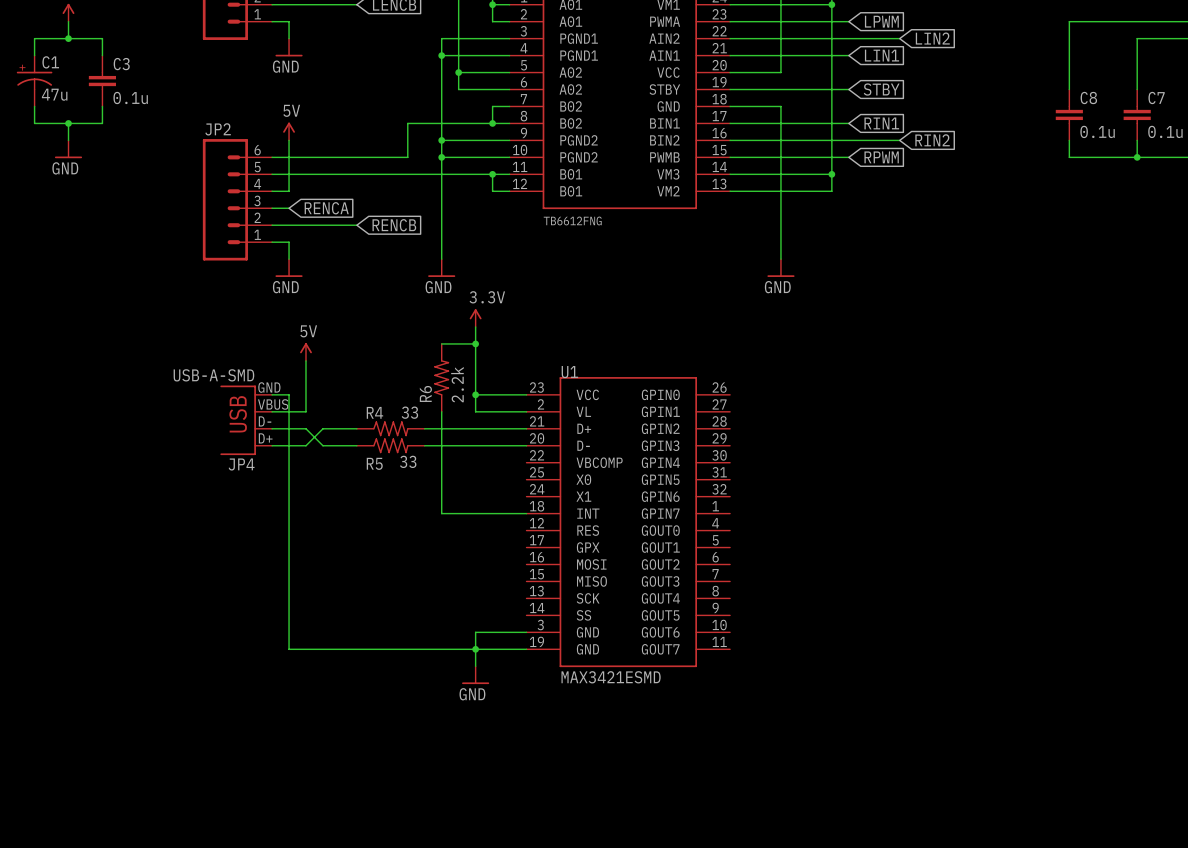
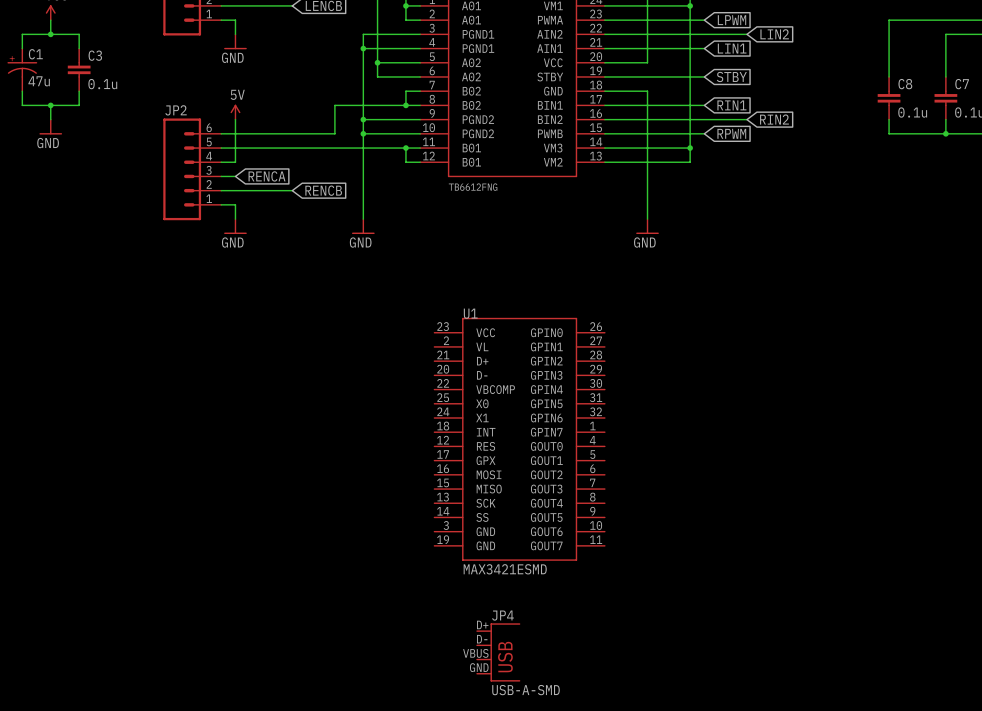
power symbol: 3.3V (475, 318) -> none
wire: (475, 327) (475, 411) (526, 411) -> none
wire: (441, 343) (475, 343) -> none
junction: (475, 343) -> none
power symbol: 5V (305, 352) -> none
wire: (305, 360) (305, 411) (272, 411) -> none
JP4 value position: USB-A-SMD (213, 375) -> USB-A-SMD (526, 690)
R6: 2.2k (441, 377) -> none
JP4 symbol: [220, 385, 273, 456] -> [477, 623, 521, 682]
wire: (272, 394) (289, 394) (289, 649) (526, 649) -> none
wire: (475, 394) (526, 394) -> none
junction: (475, 394) -> none
wire: (441, 411) (441, 513) (526, 513) -> none
wire: (272, 428) (305, 428) (322, 445) (356, 445) -> none
wire: (356, 428) (322, 428) (305, 445) (272, 445) -> none
R4: 33 (390, 428) -> none
wire: (424, 428) (526, 428) -> none
R5: 33 (390, 445) -> none
wire: (424, 445) (526, 445) -> none
JP4 name position: JP4 (241, 464) -> JP4 (502, 615)
wire: (526, 632) (475, 632) (475, 666) -> none
junction: (475, 649) -> none
power symbol: GND (475, 675) -> none

